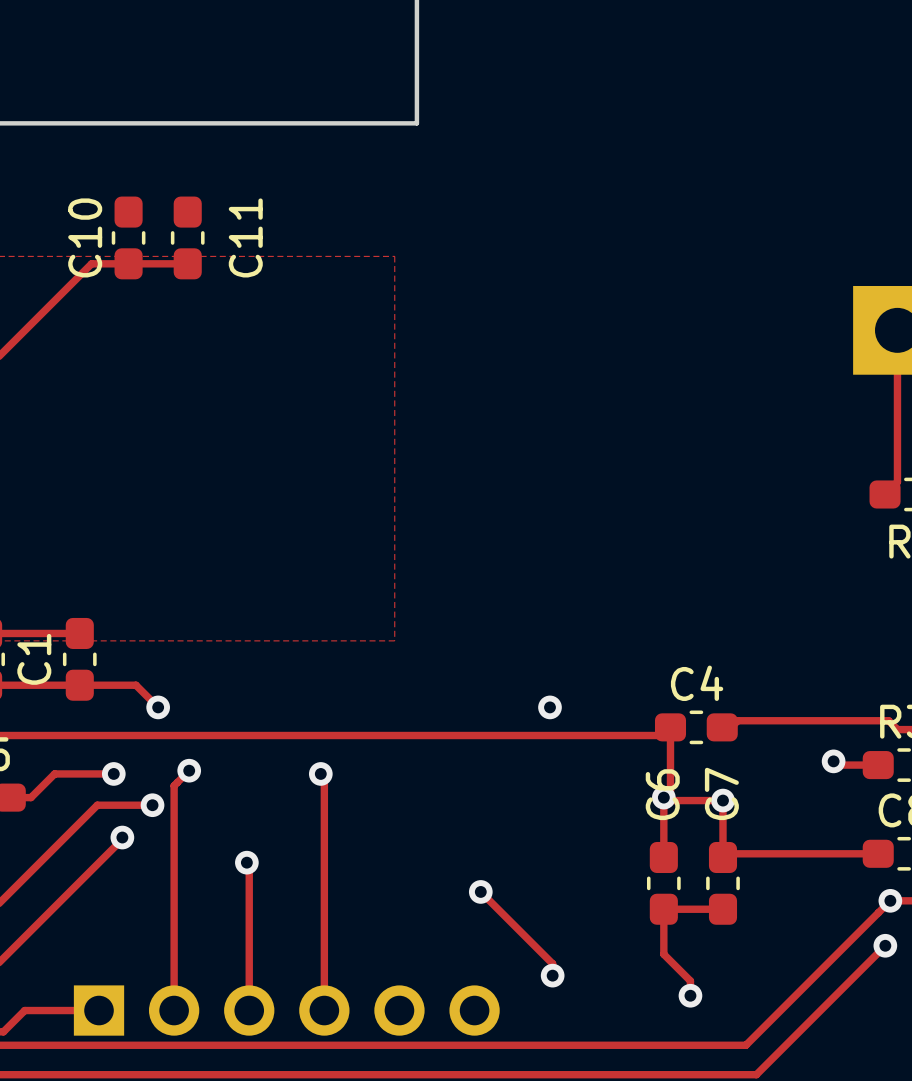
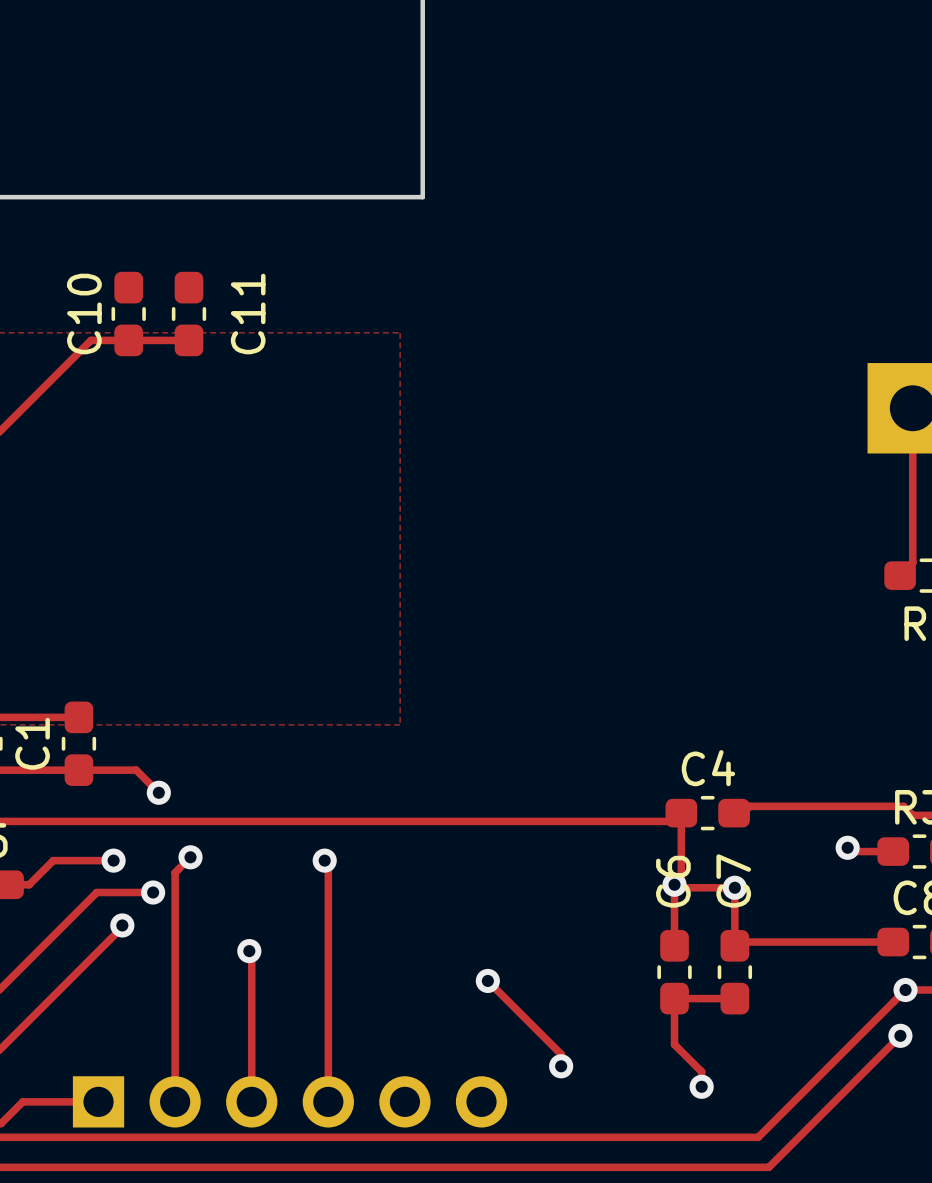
via: (549, 707) -> none

